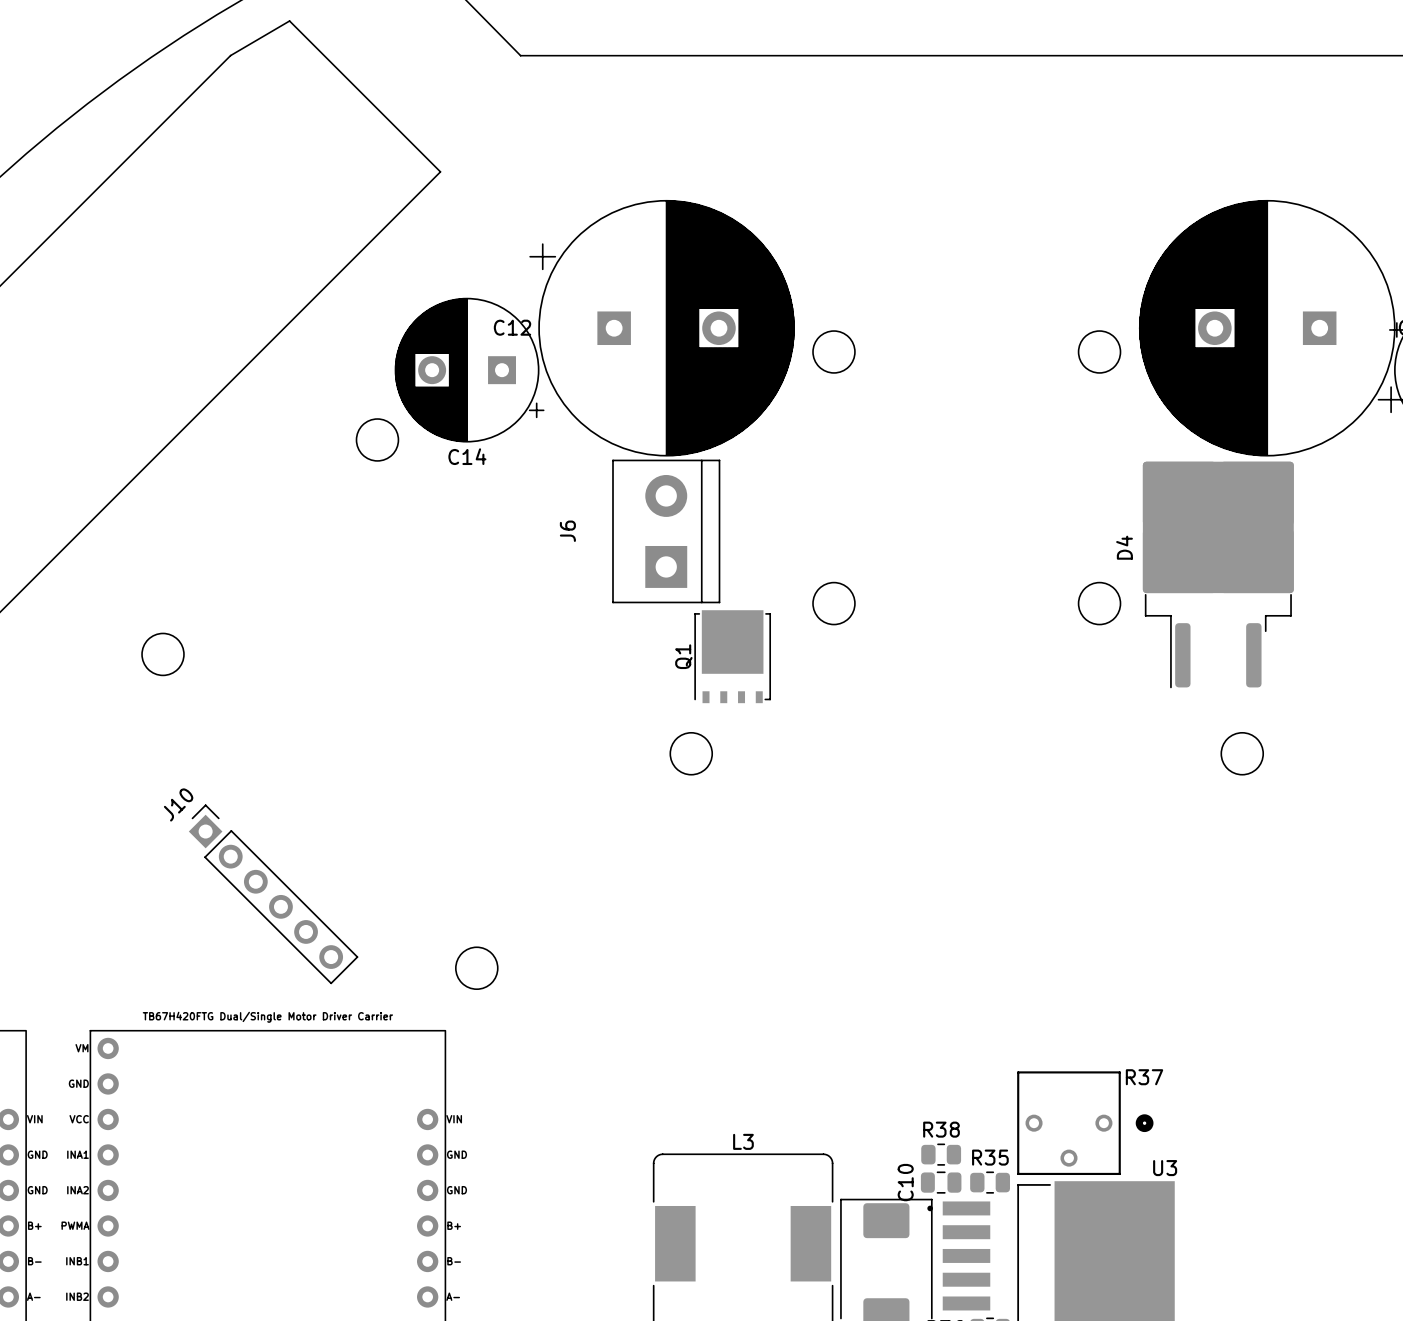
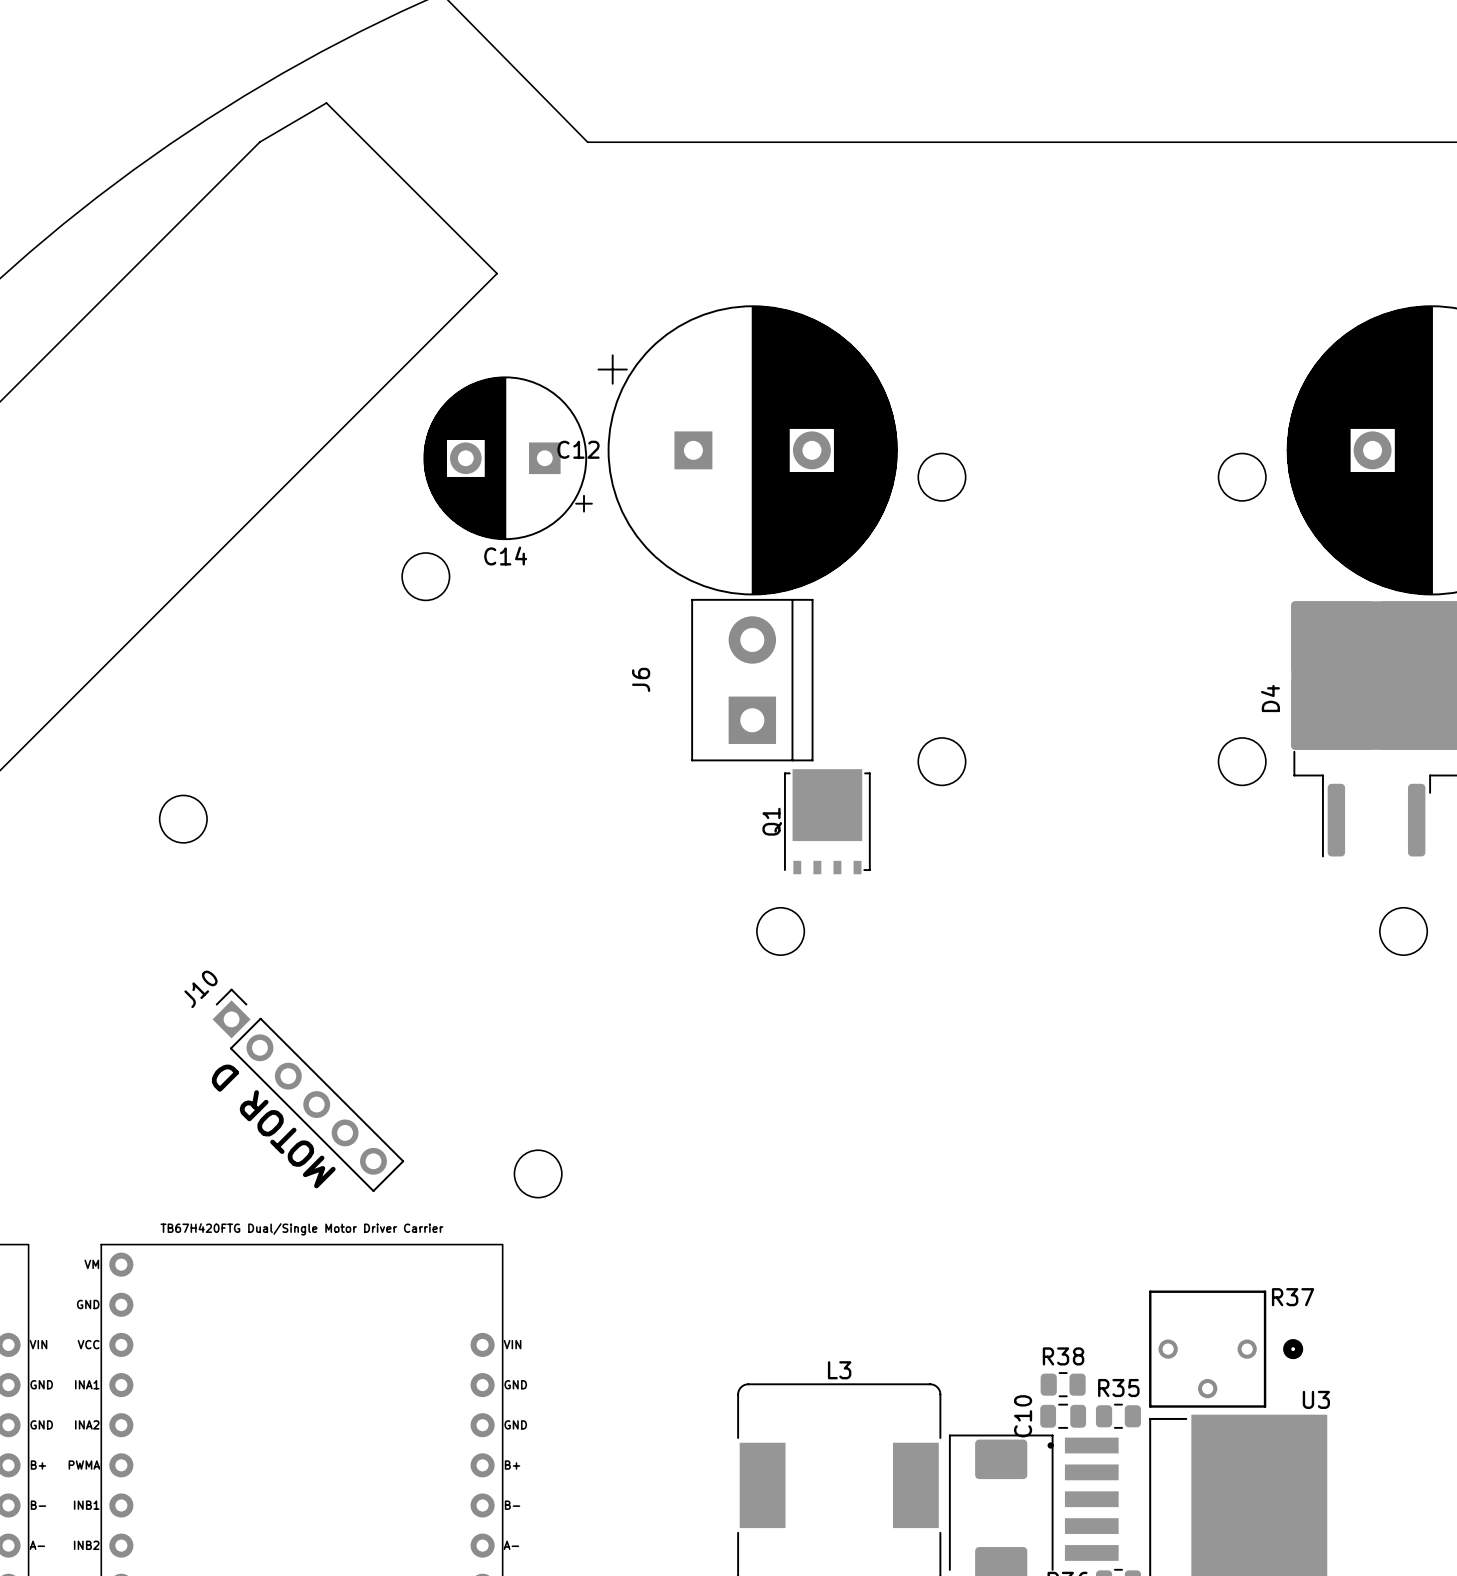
C14 position: (469, 370) -> (508, 458)
text: none -> MOTOR D (273, 1126)

